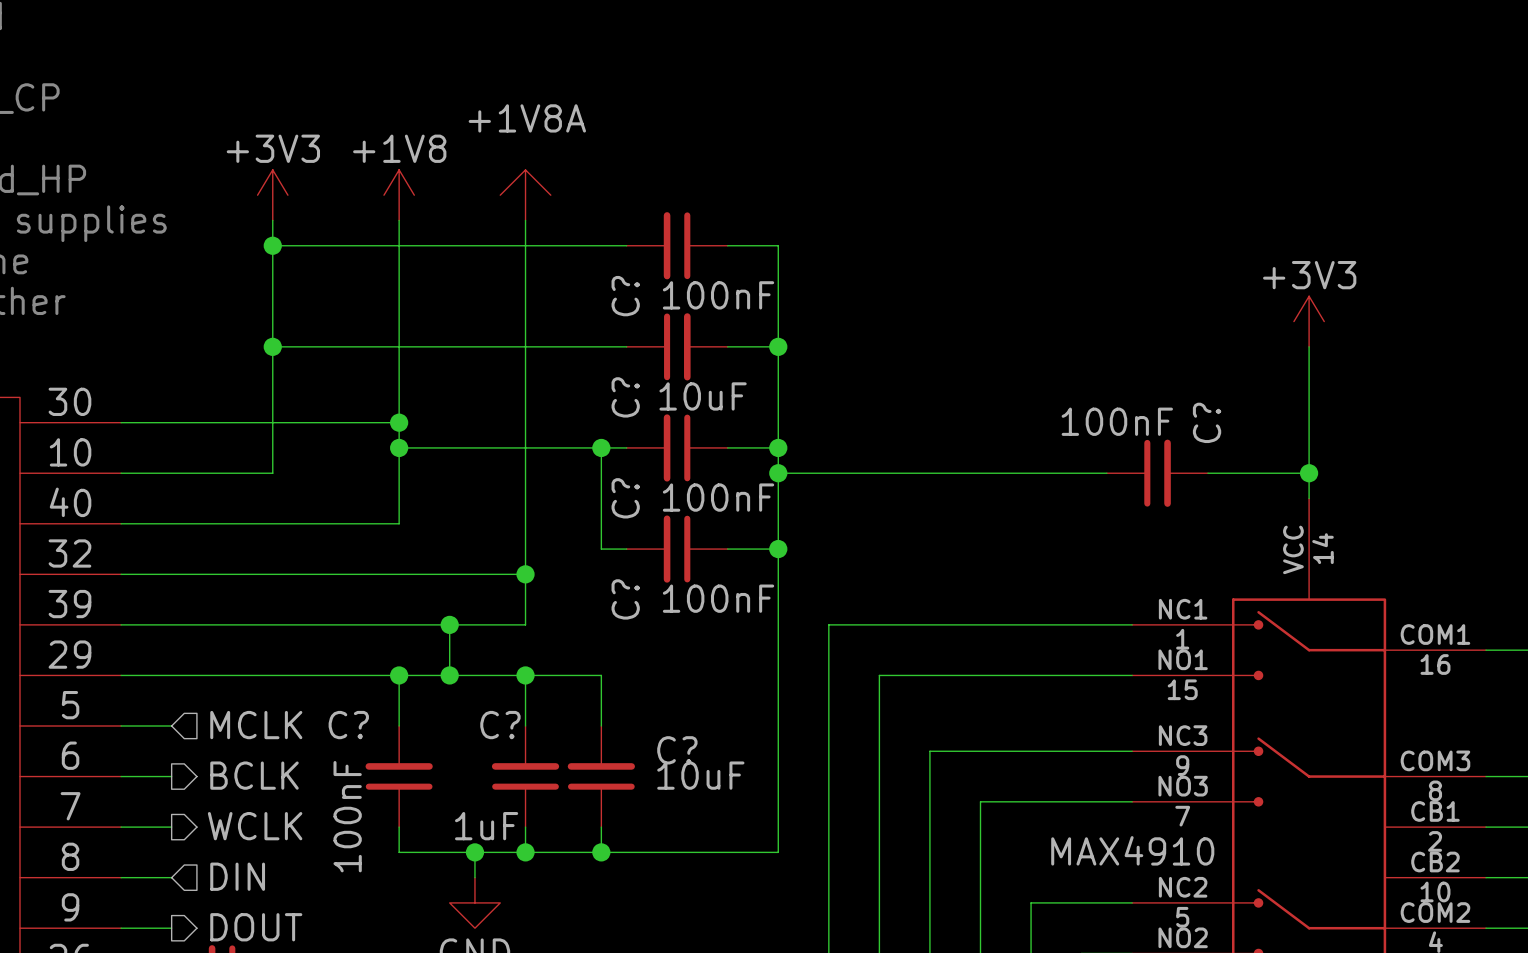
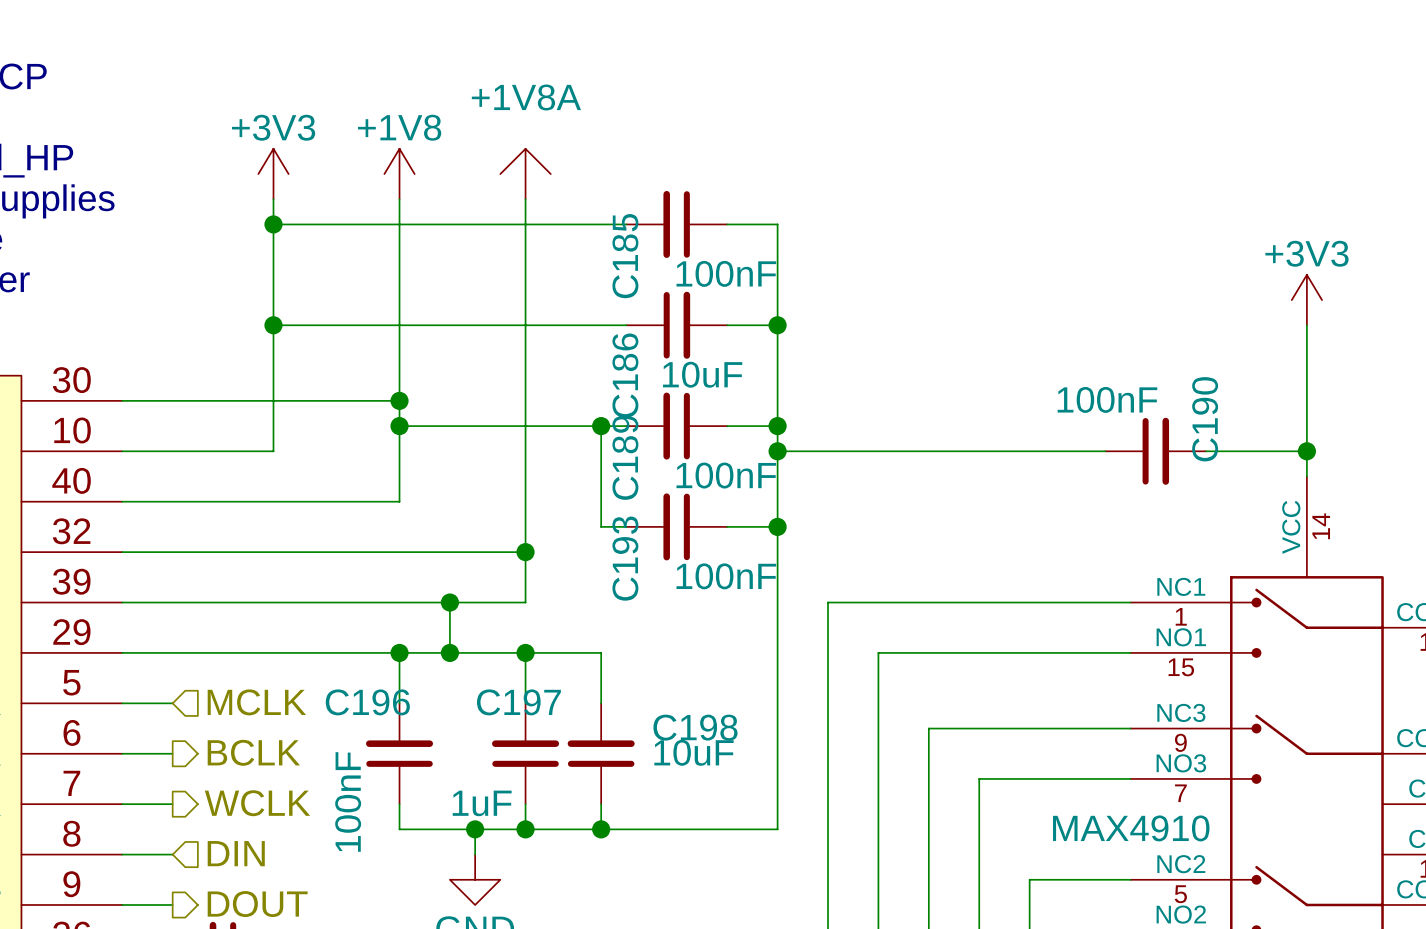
C? name: C? (625, 296) -> C185 (625, 256)
C? name: C? (625, 397) -> C186 (625, 375)
C? name: C? (1207, 422) -> C190 (1205, 419)
C? name: C? (625, 498) -> C189 (625, 457)
C? name: C? (625, 599) -> C193 (625, 558)
C? name: C? (348, 725) -> C196 (367, 702)
C? name: C? (500, 725) -> C197 (518, 702)
C? name: C? (677, 750) -> C198 (695, 727)

